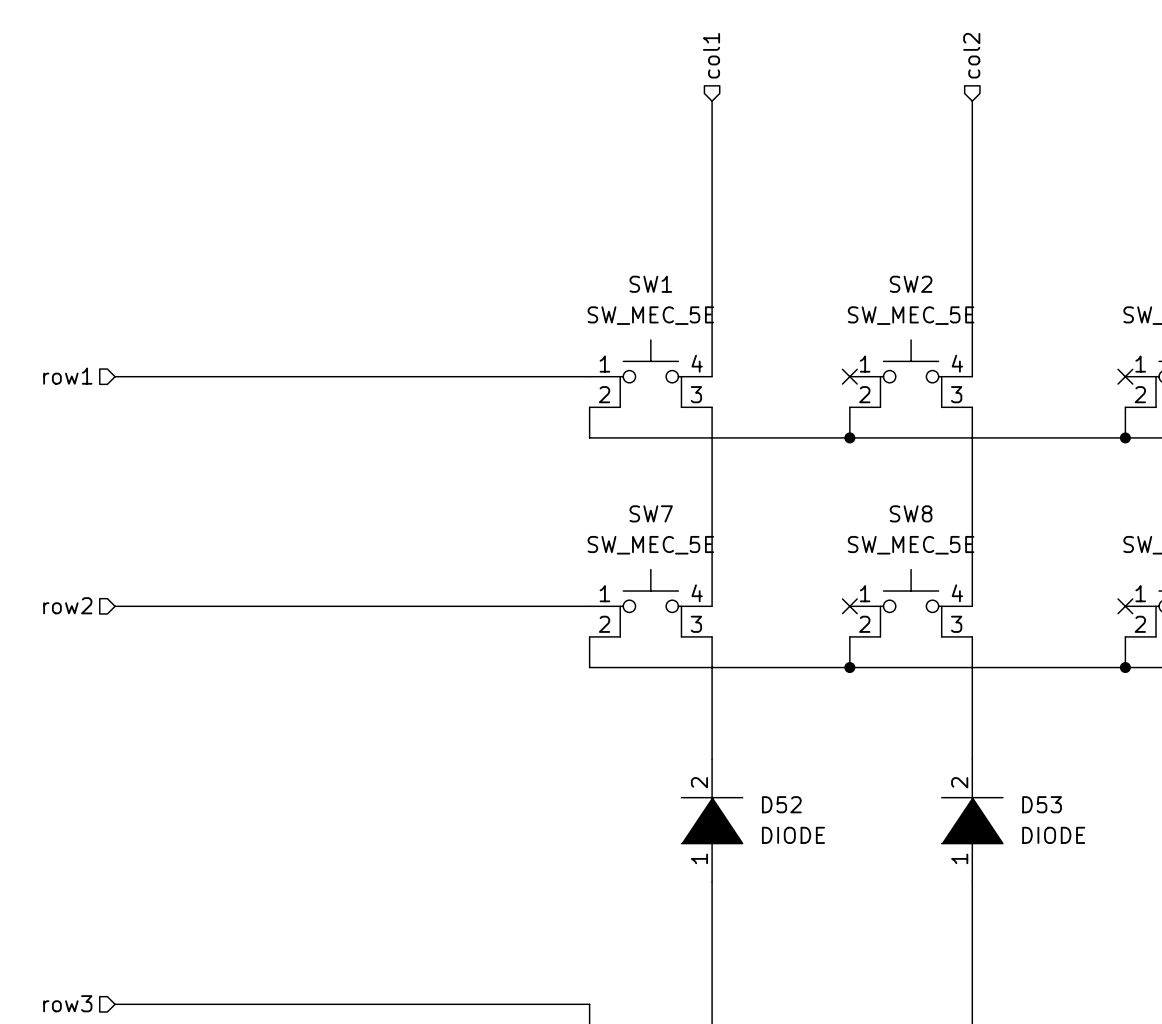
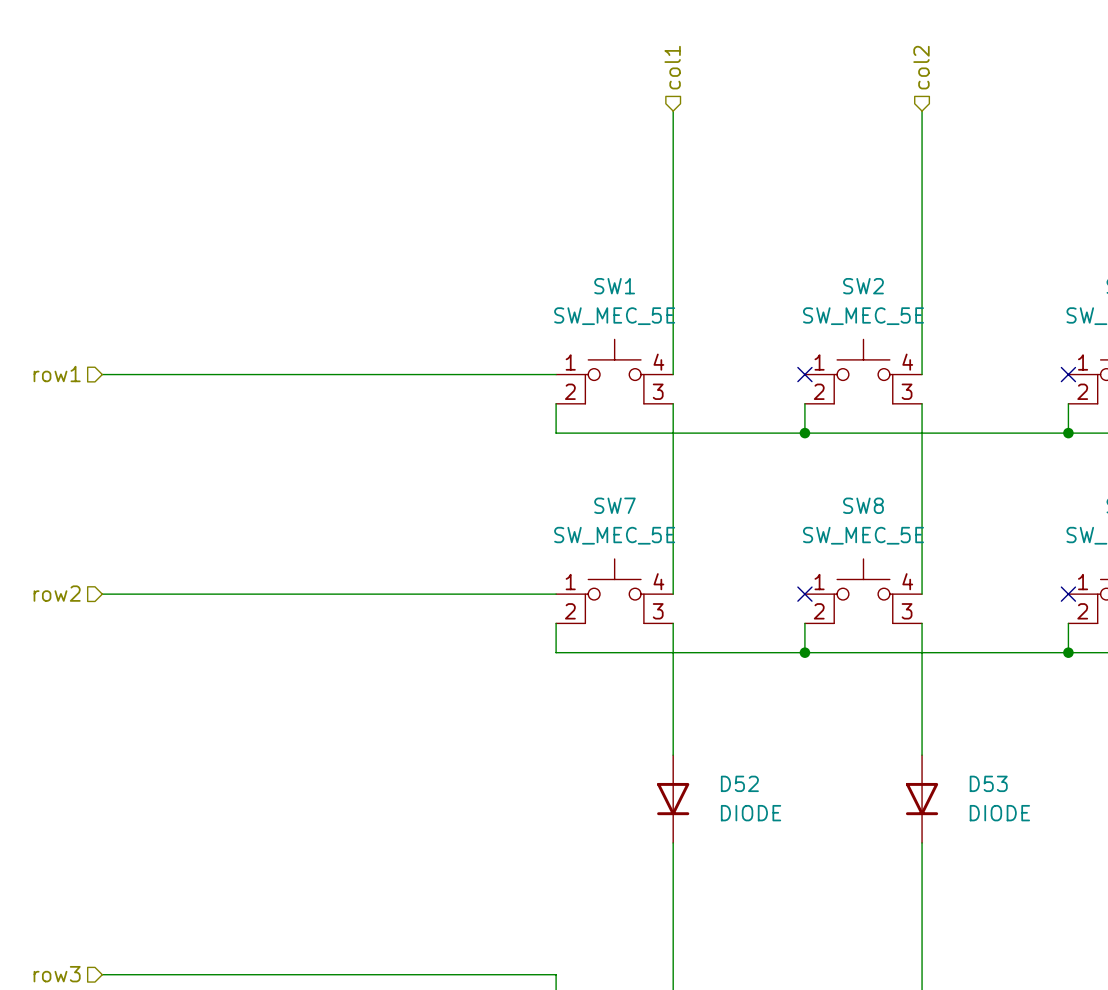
D52 symbol: [681, 759, 743, 882] -> [657, 755, 690, 843]
D53 symbol: [941, 759, 1003, 882] -> [905, 755, 939, 843]

